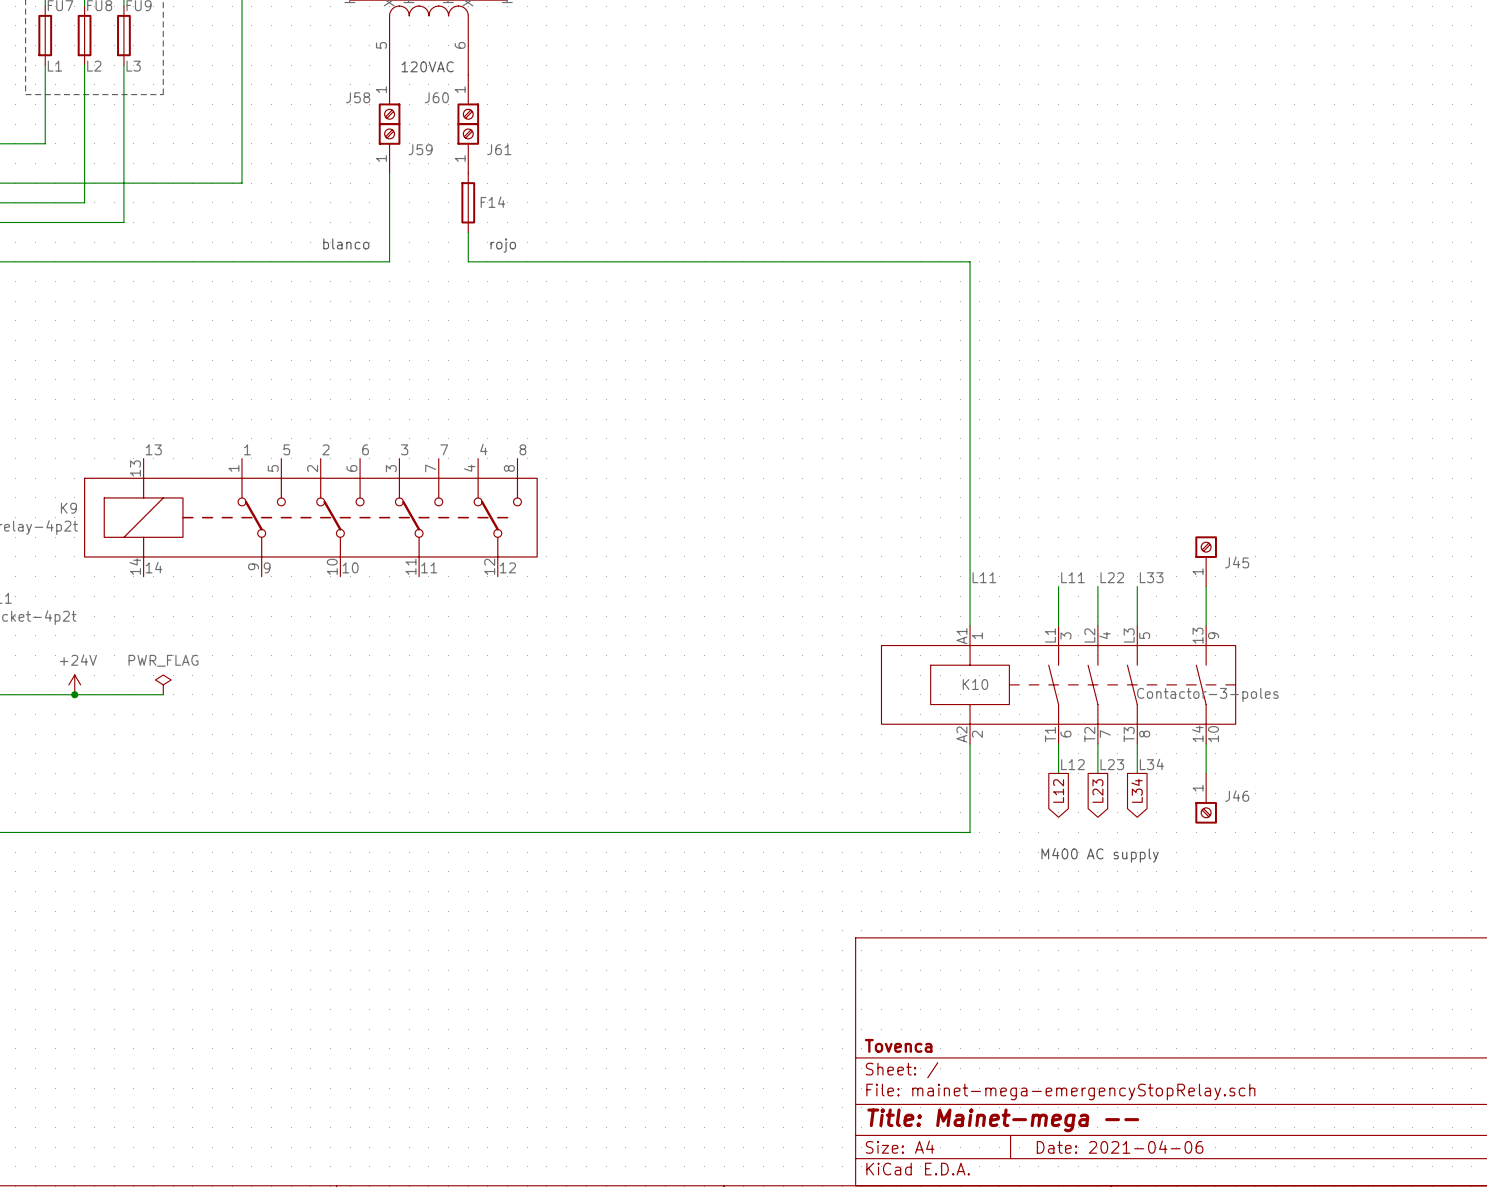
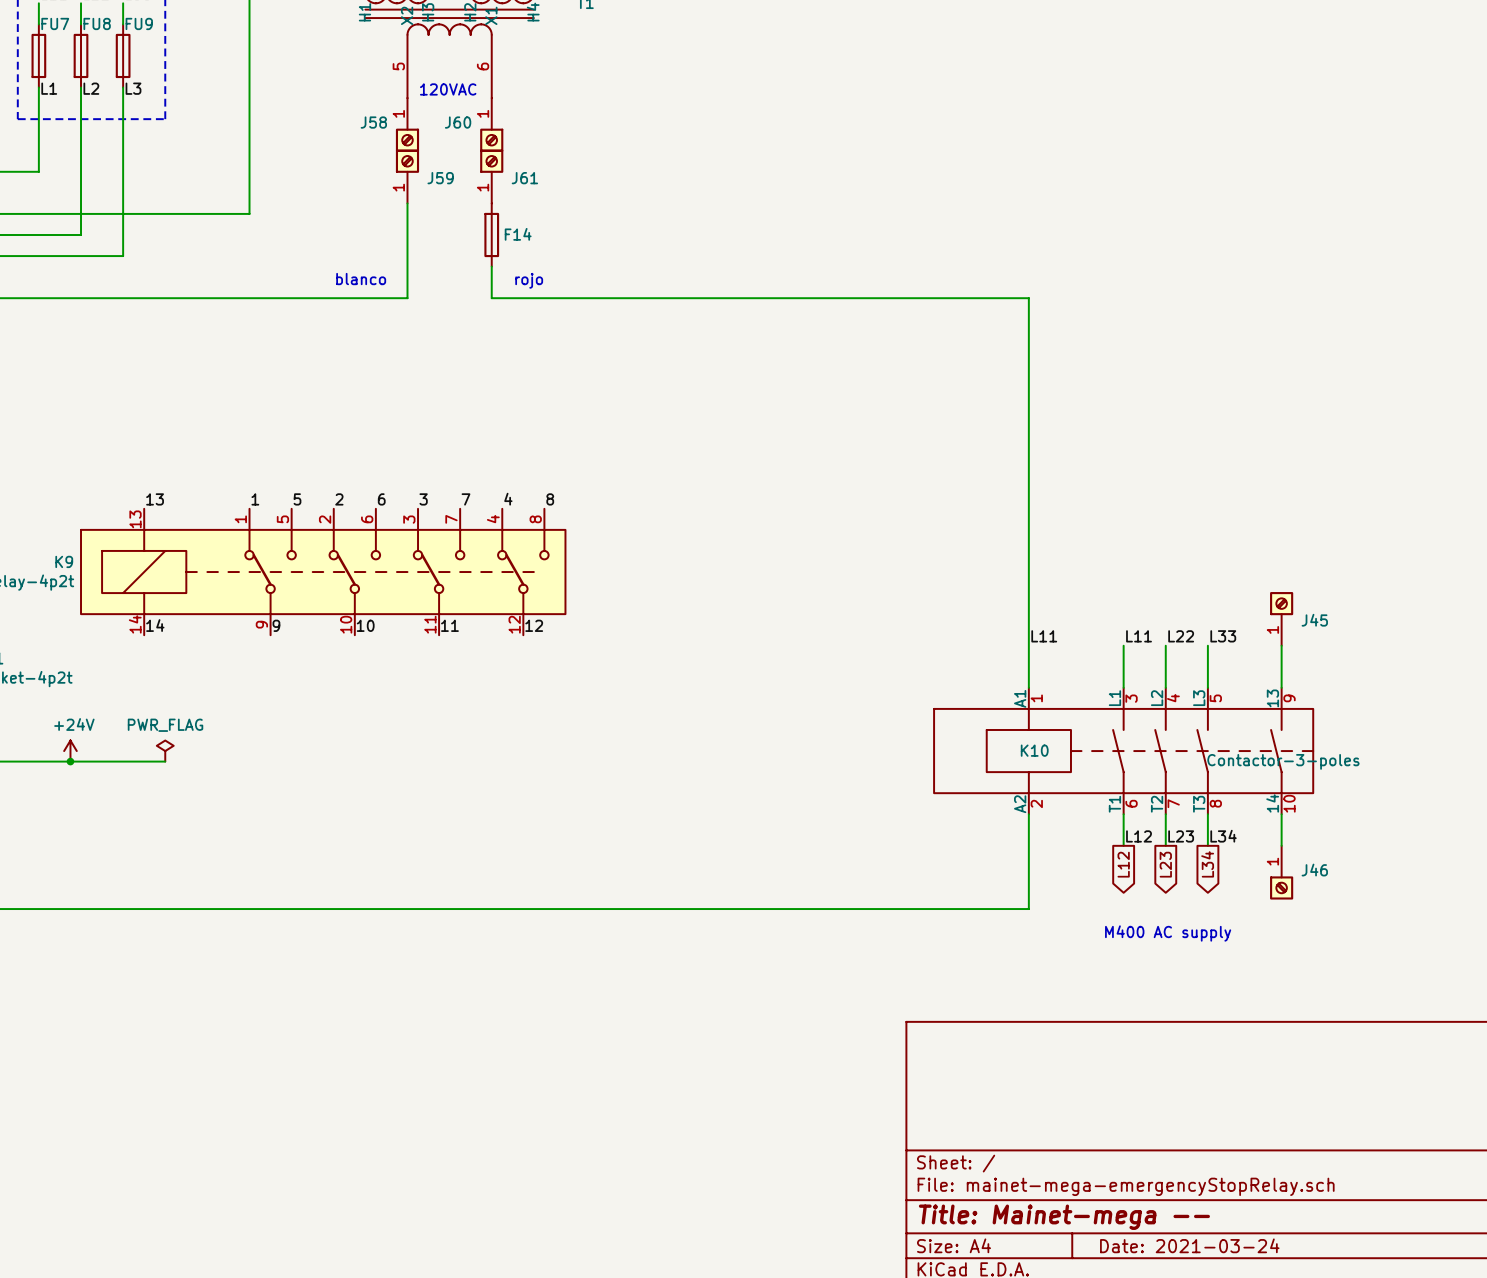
title block: Tovenca (898, 1045) -> none
title block: Date: 2021-04-06 (1120, 1147) -> Date: 2021-03-24 (1189, 1245)

